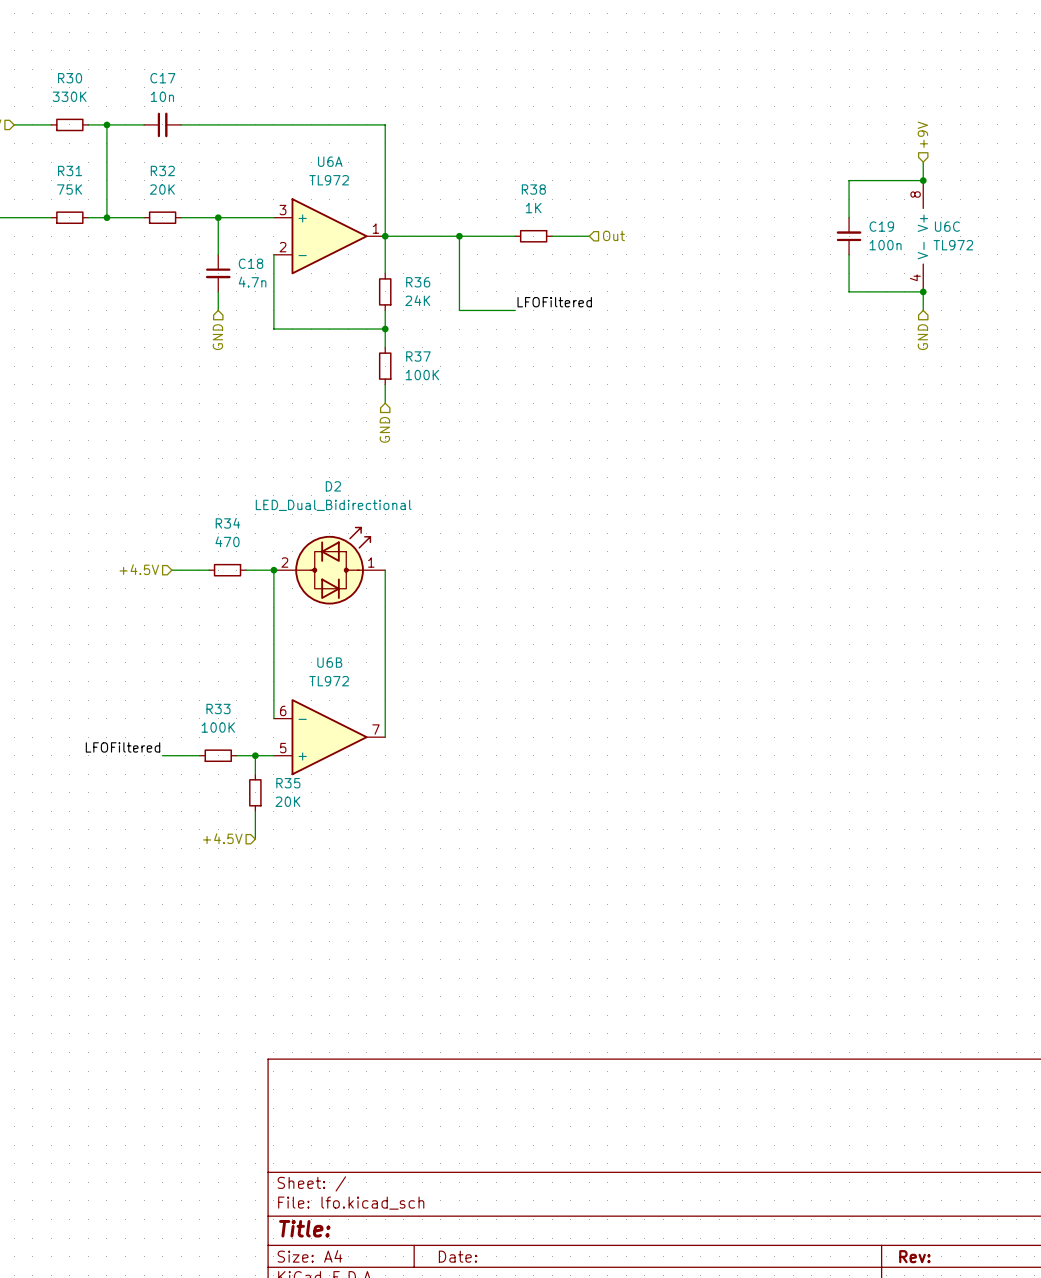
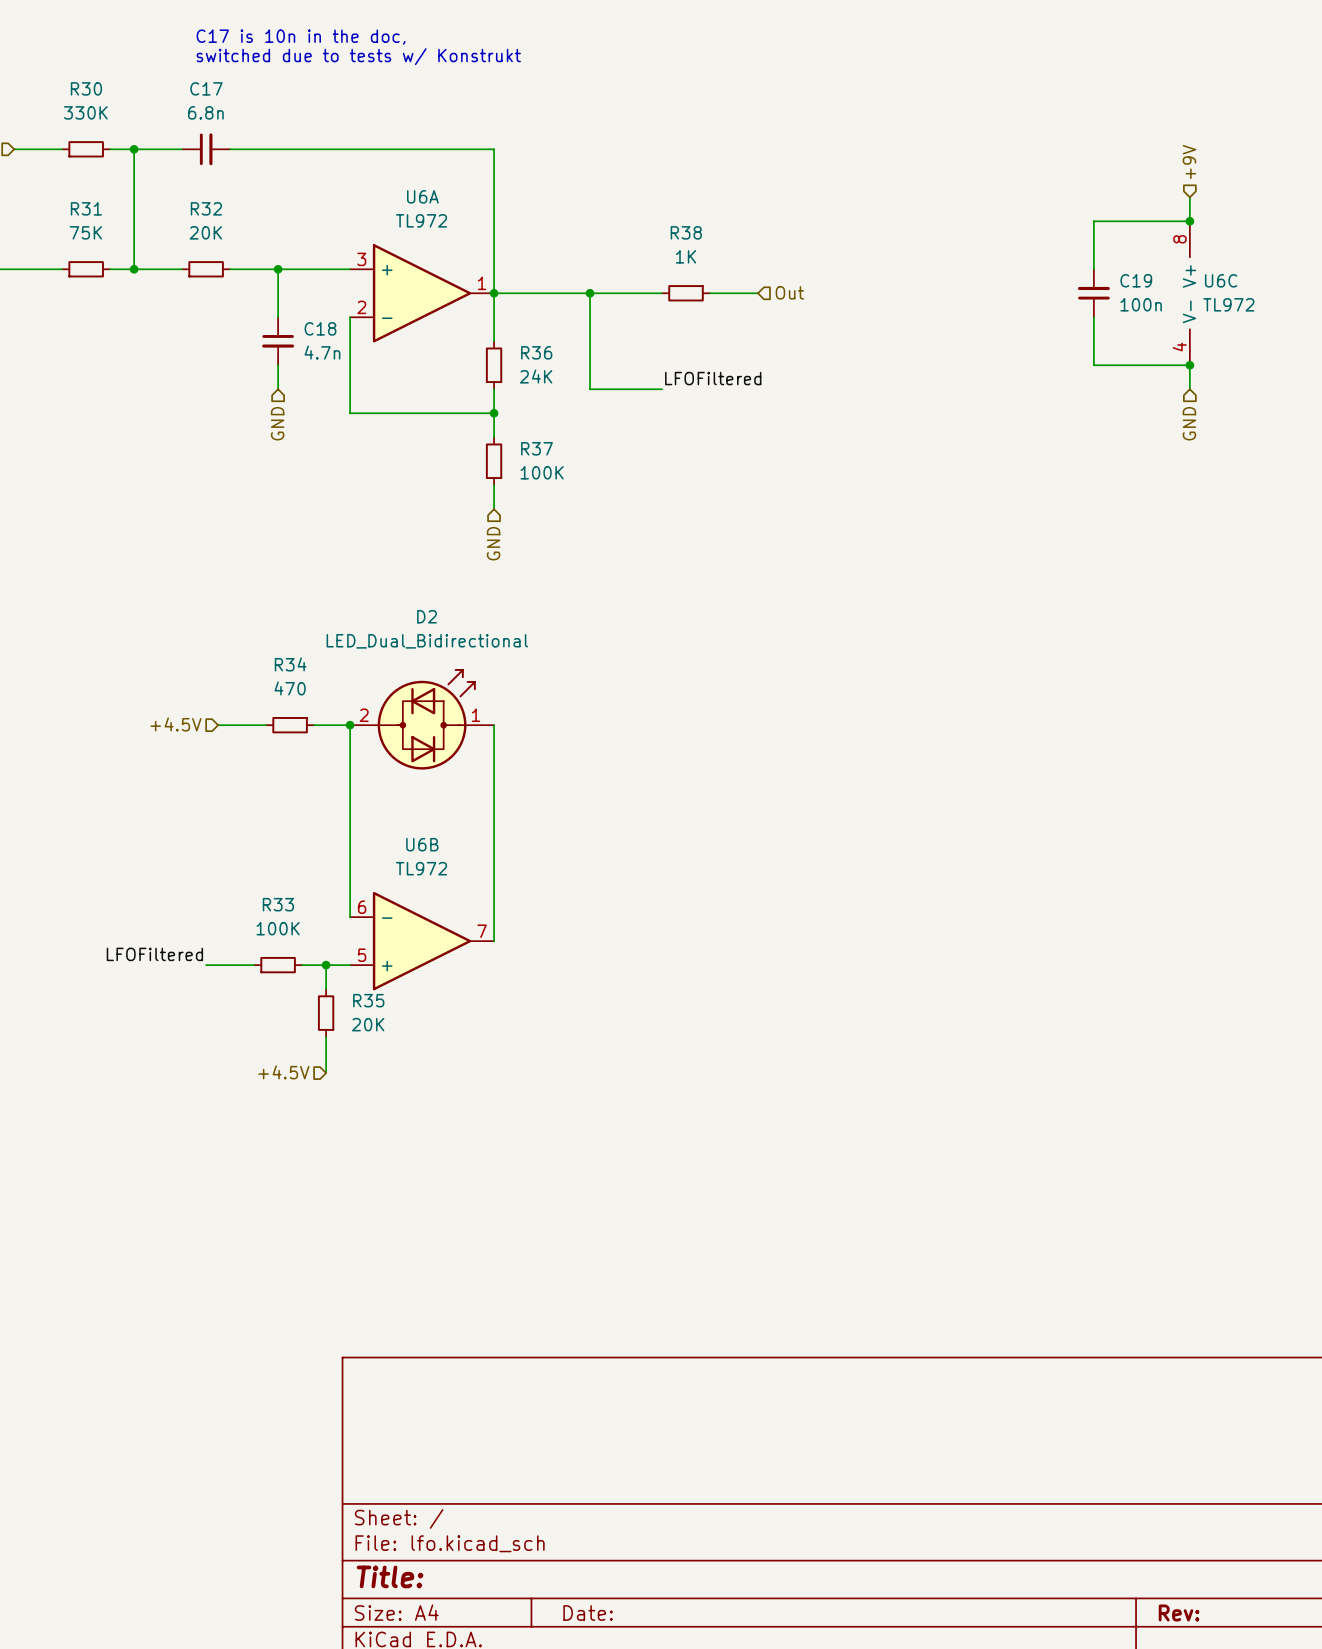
text: none -> C17 is 10n in the doc, (301, 37)
text: none -> switched due to tests w/ Konstrukt (358, 56)
C17 value: 10n (162, 96) -> 6.8n (205, 112)

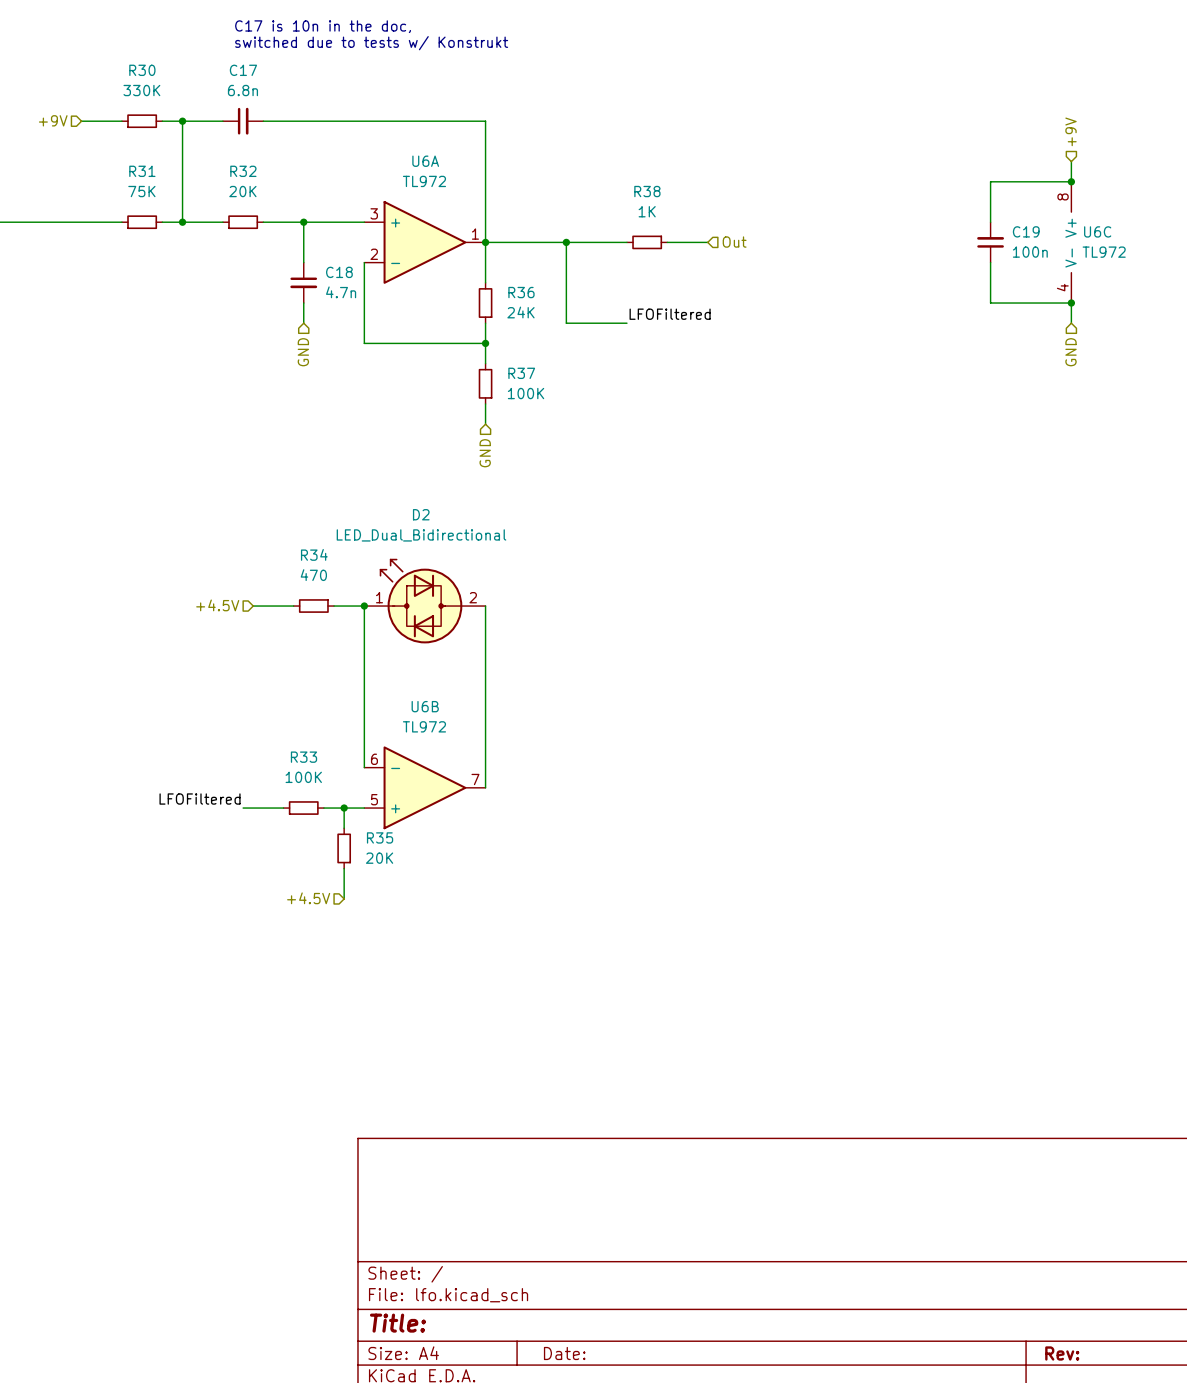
D2 flip: as is (426, 719) -> left-right (421, 601)

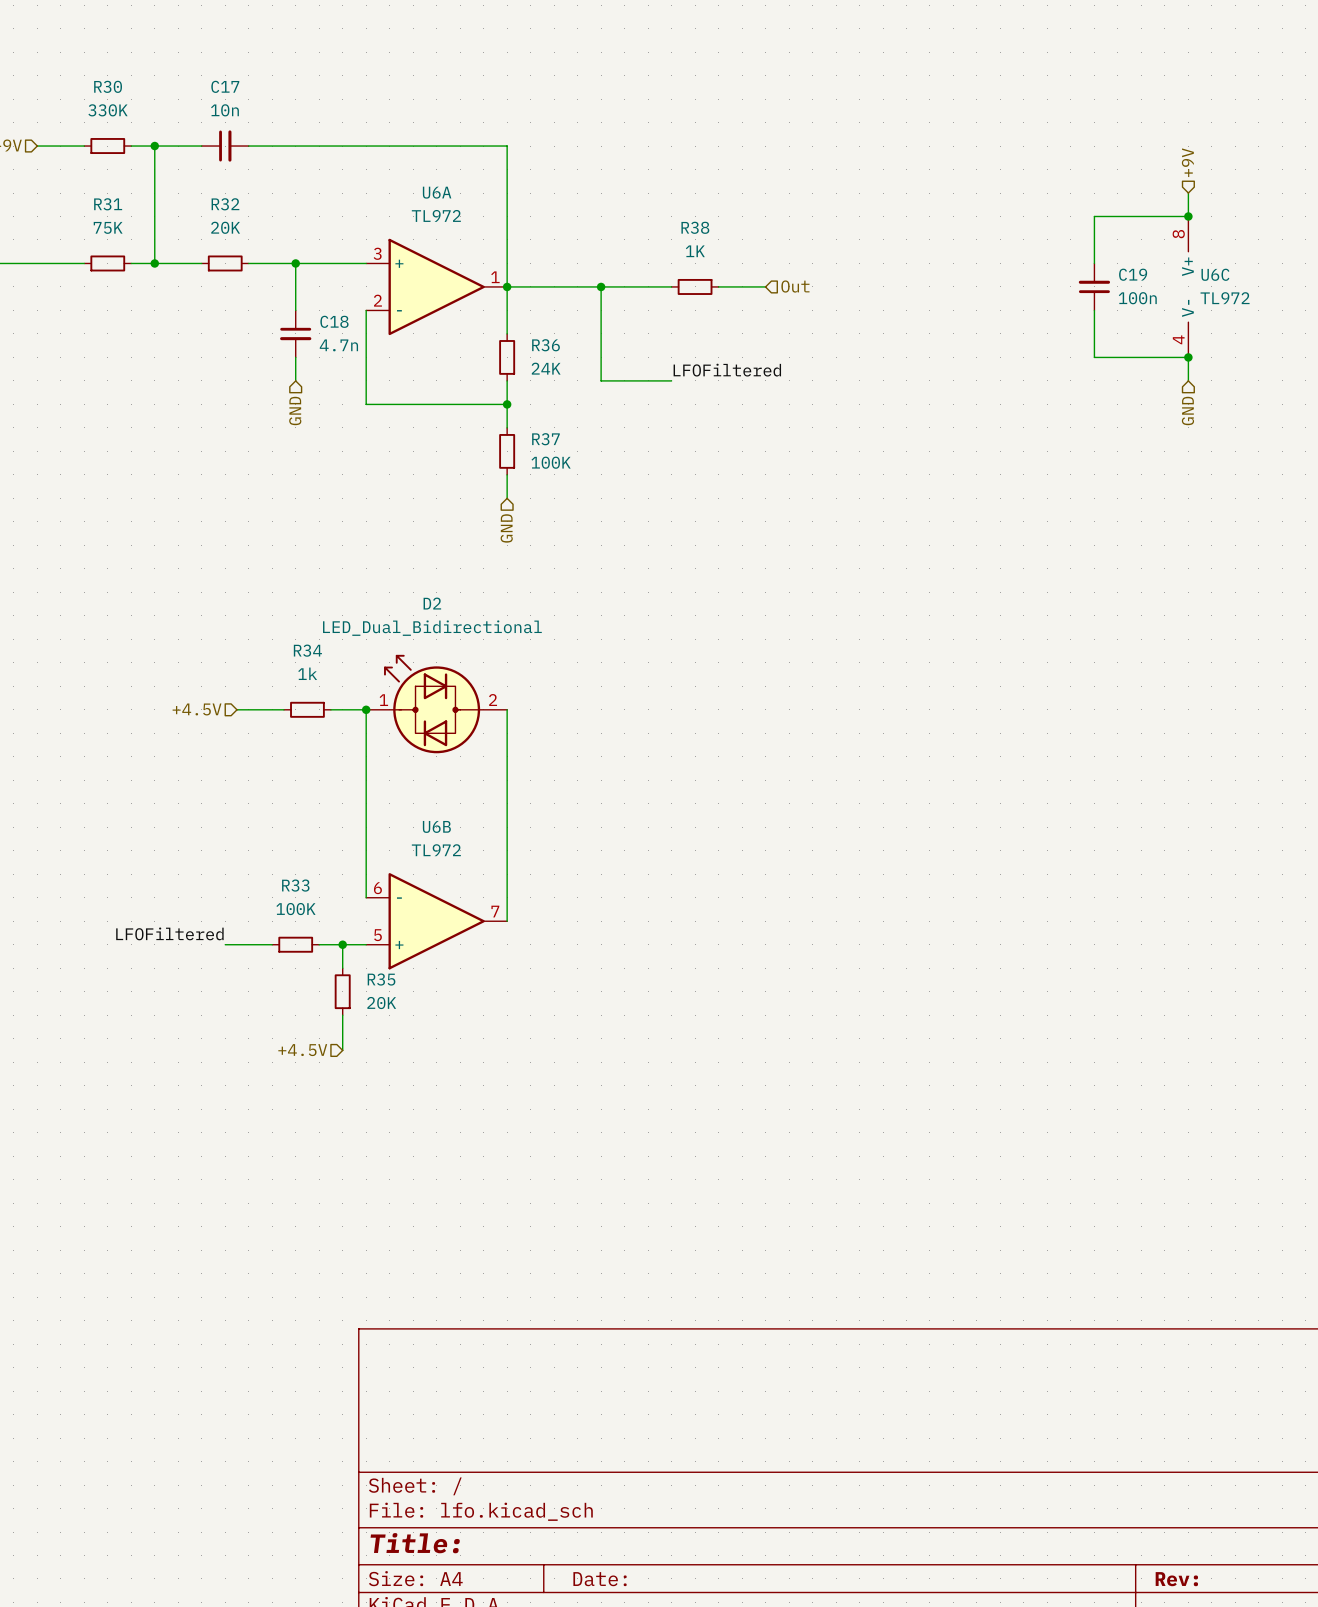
text: C17 is 10n in the doc, (323, 26) -> none
text: switched due to tests w/ Konstrukt (371, 43) -> none
C17 value: 6.8n (242, 90) -> 10n (224, 110)
R34 value: 470 (313, 575) -> 1k (307, 673)

